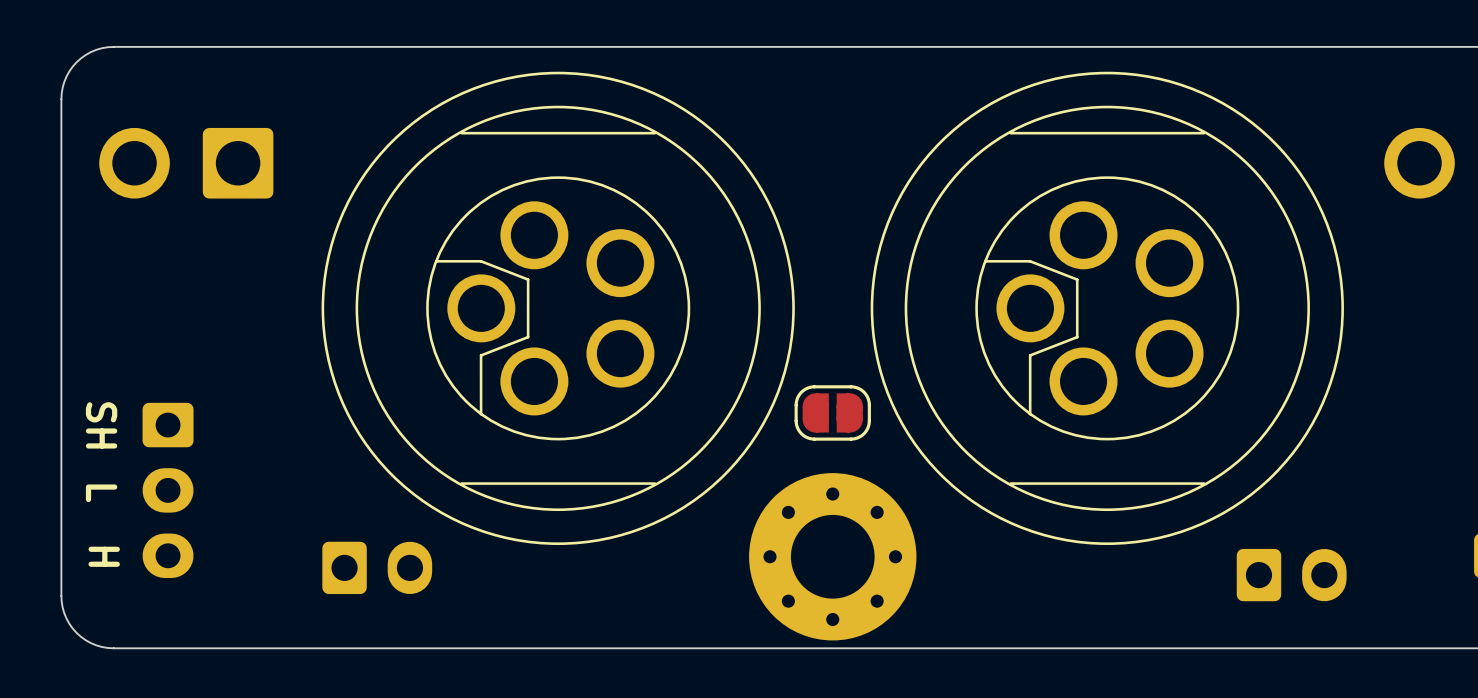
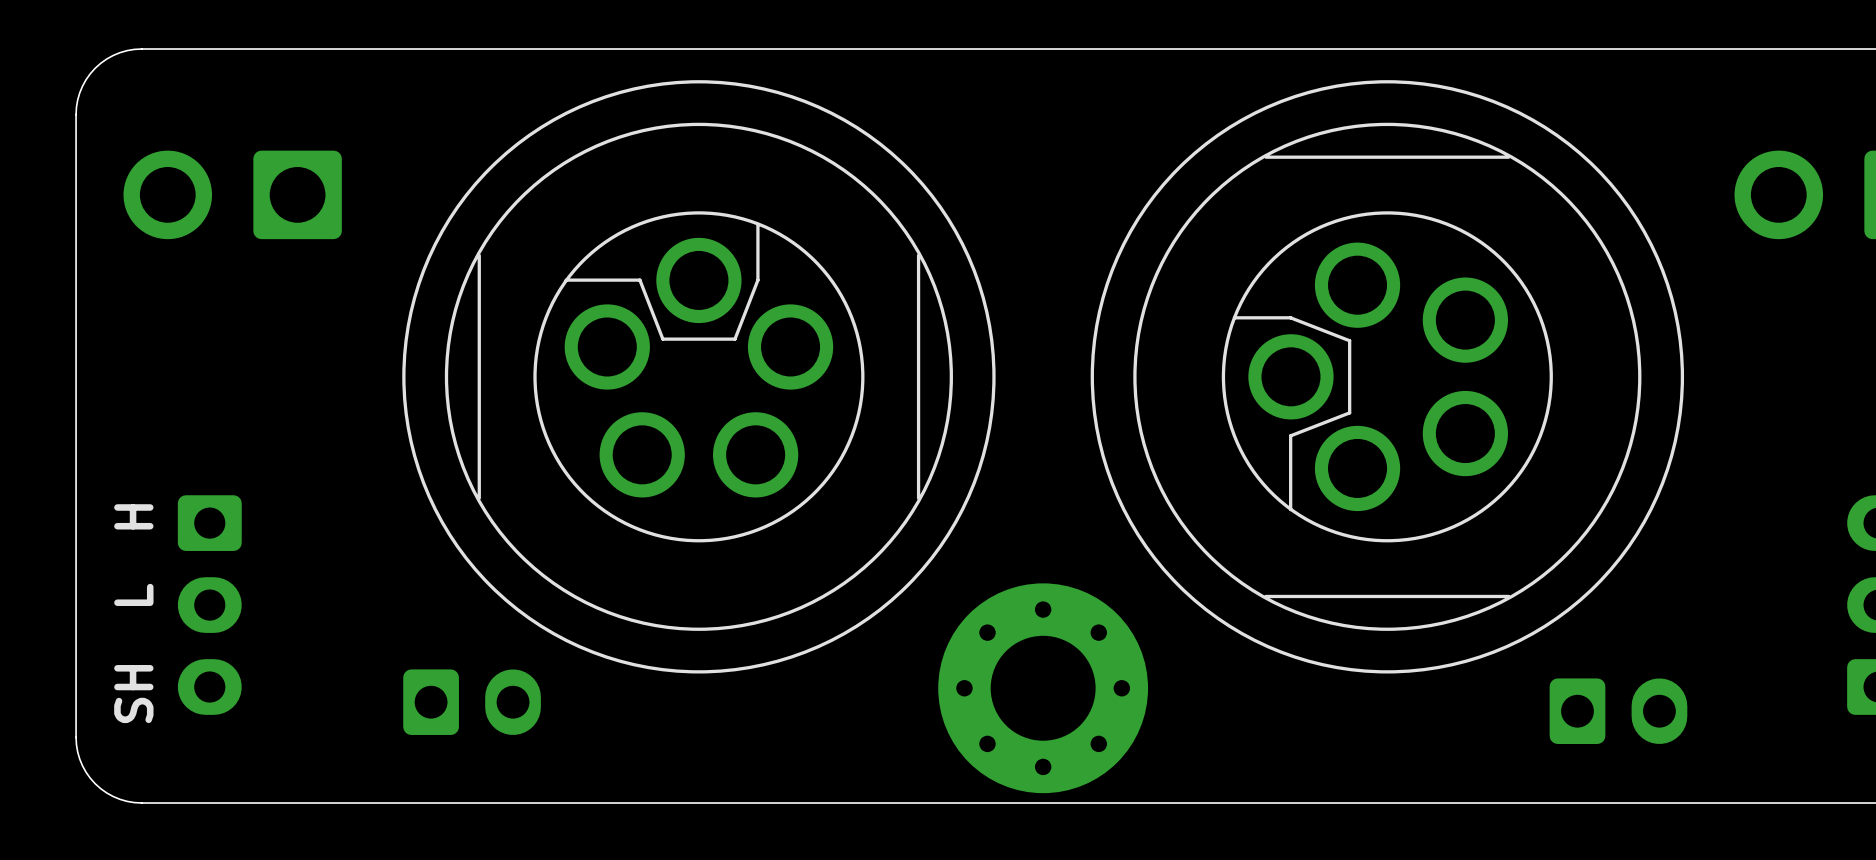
part rotation: 0° (558, 308) -> 90° clockwise (698, 376)
part: (832, 412) -> none
text: SH (101, 425) -> none
text: L (101, 493) -> SH L H (133, 613)
text: H (104, 556) -> none

